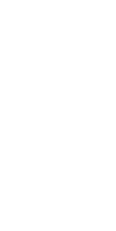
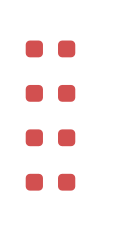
part: none -> (50, 48)
part: none -> (50, 93)
part: none -> (50, 137)
part: none -> (50, 182)

